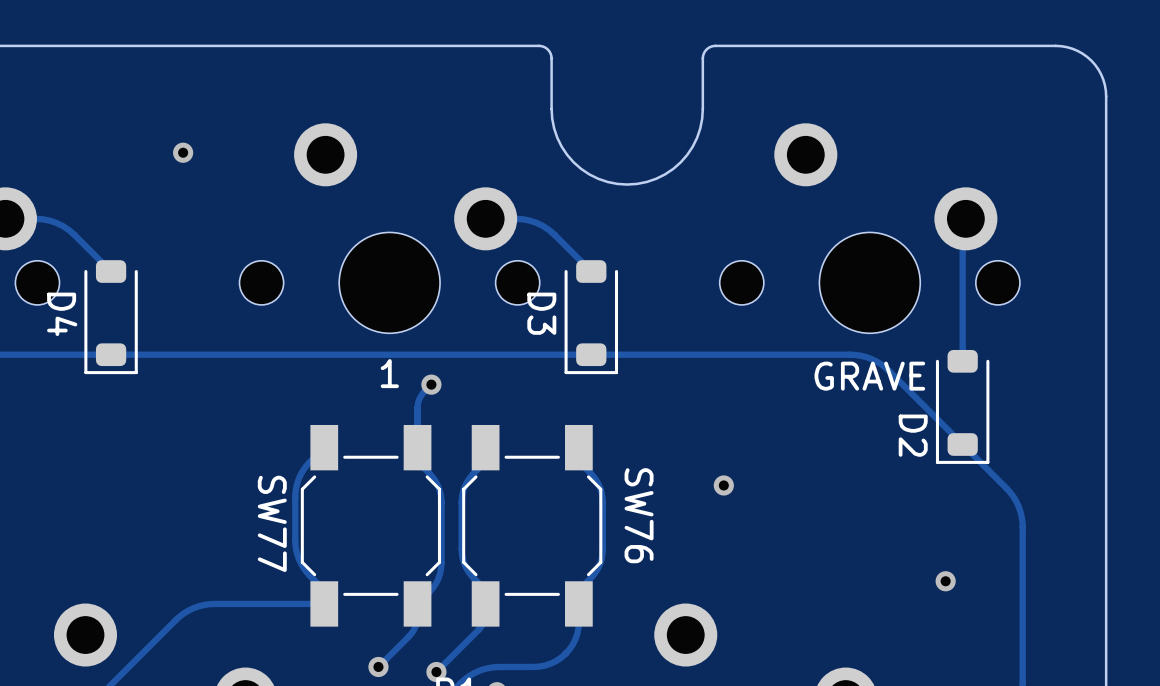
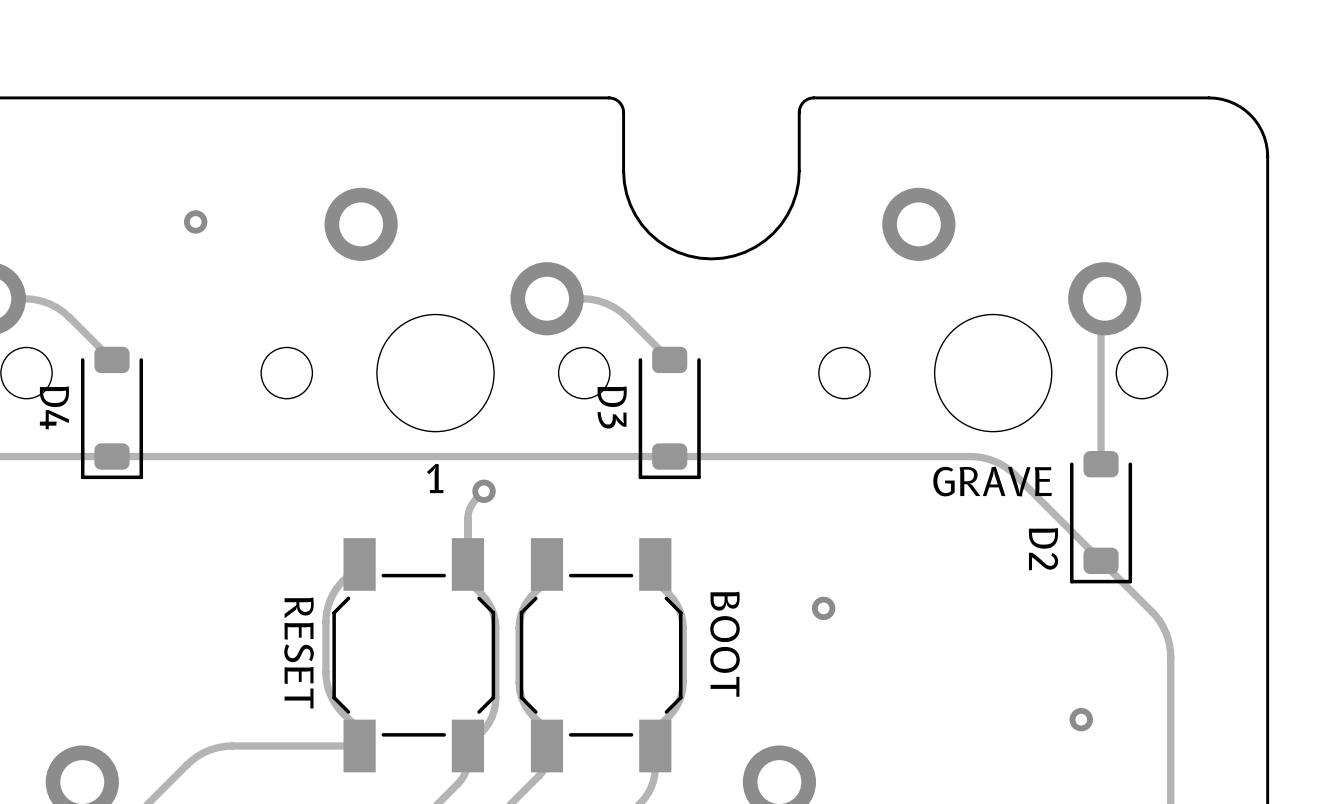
SW76 name: SW76 (639, 515) -> BOOT (724, 644)
SW77 name: SW77 (272, 523) -> RESET (299, 652)

